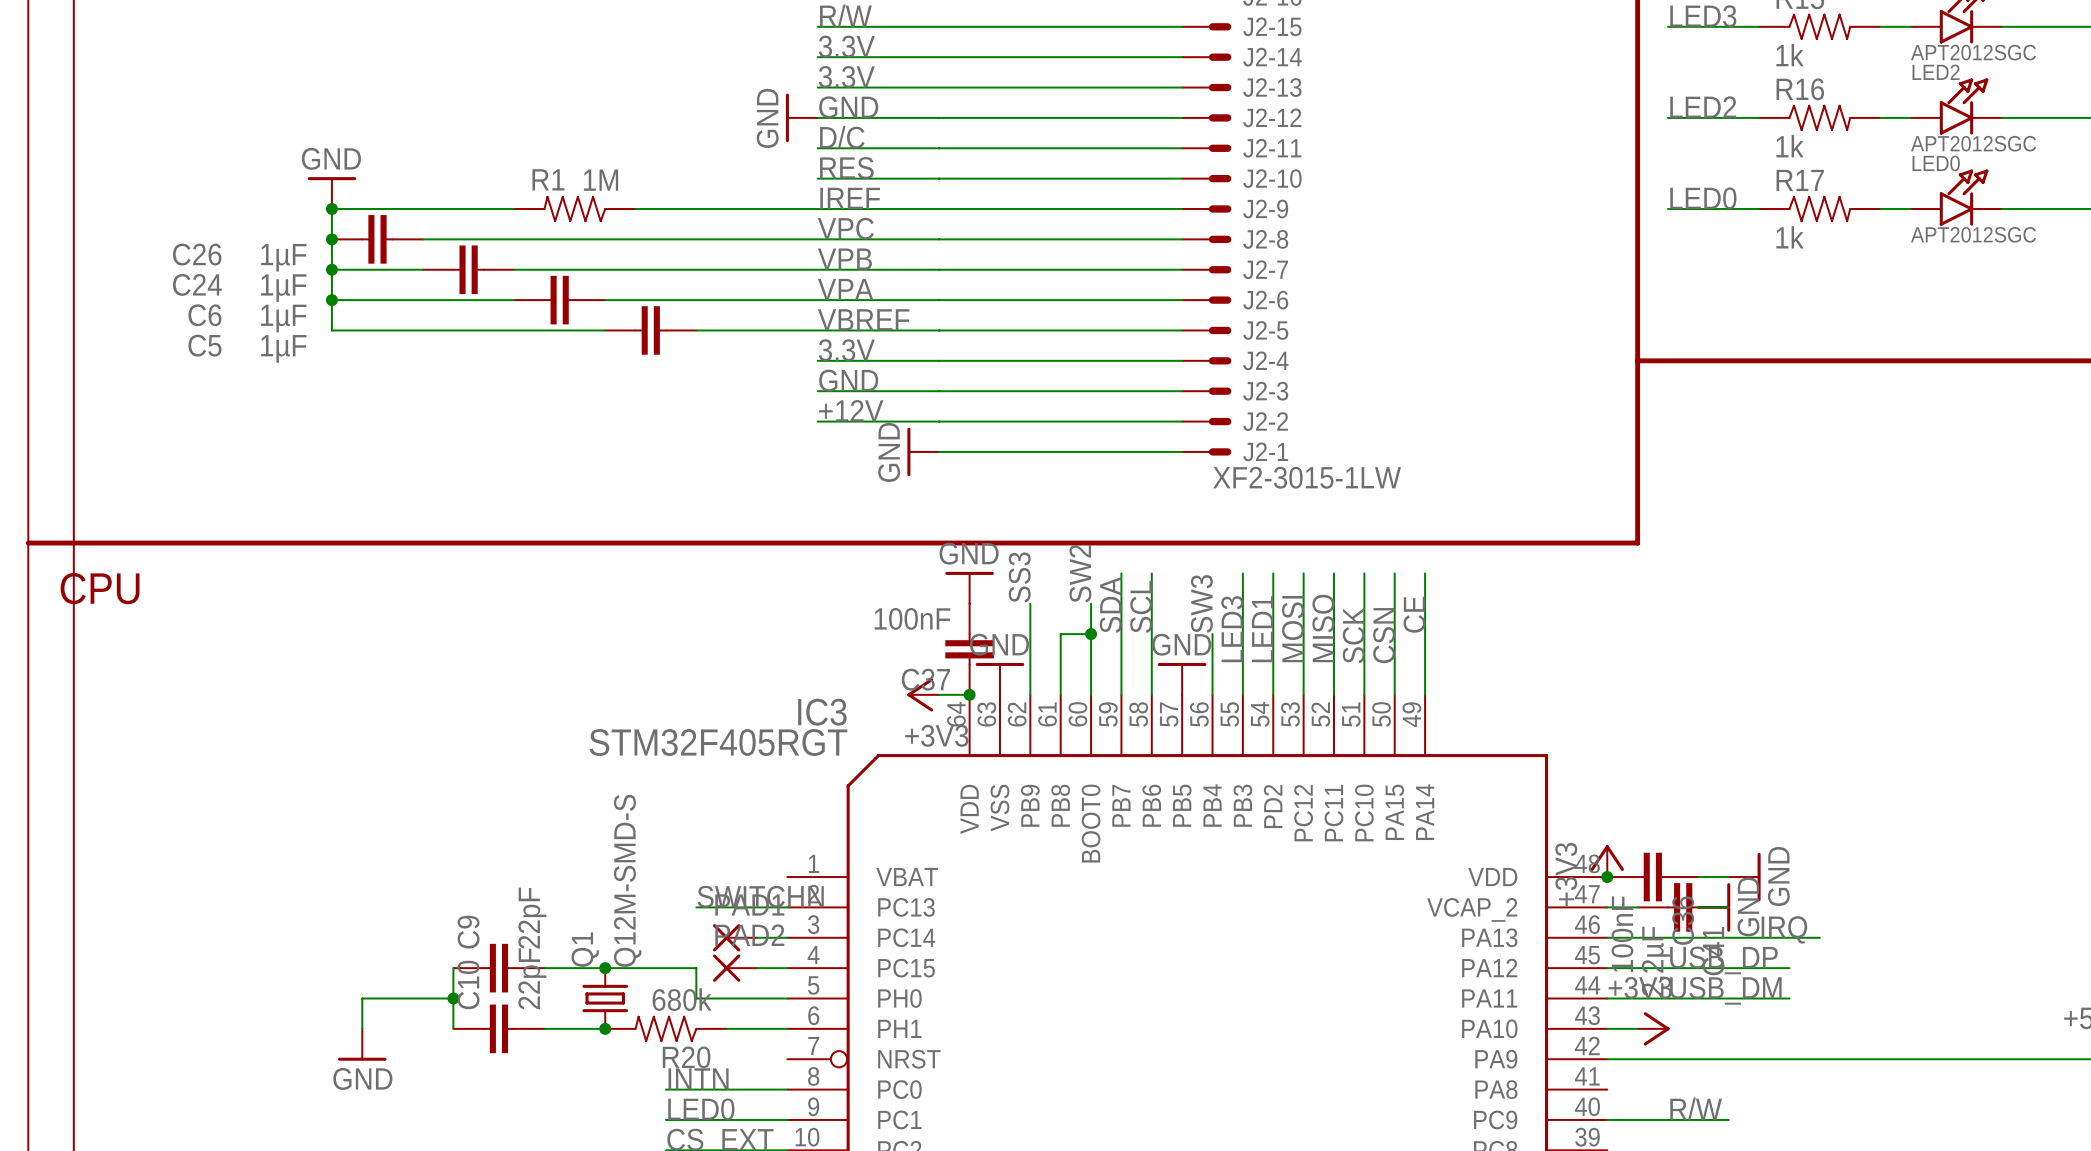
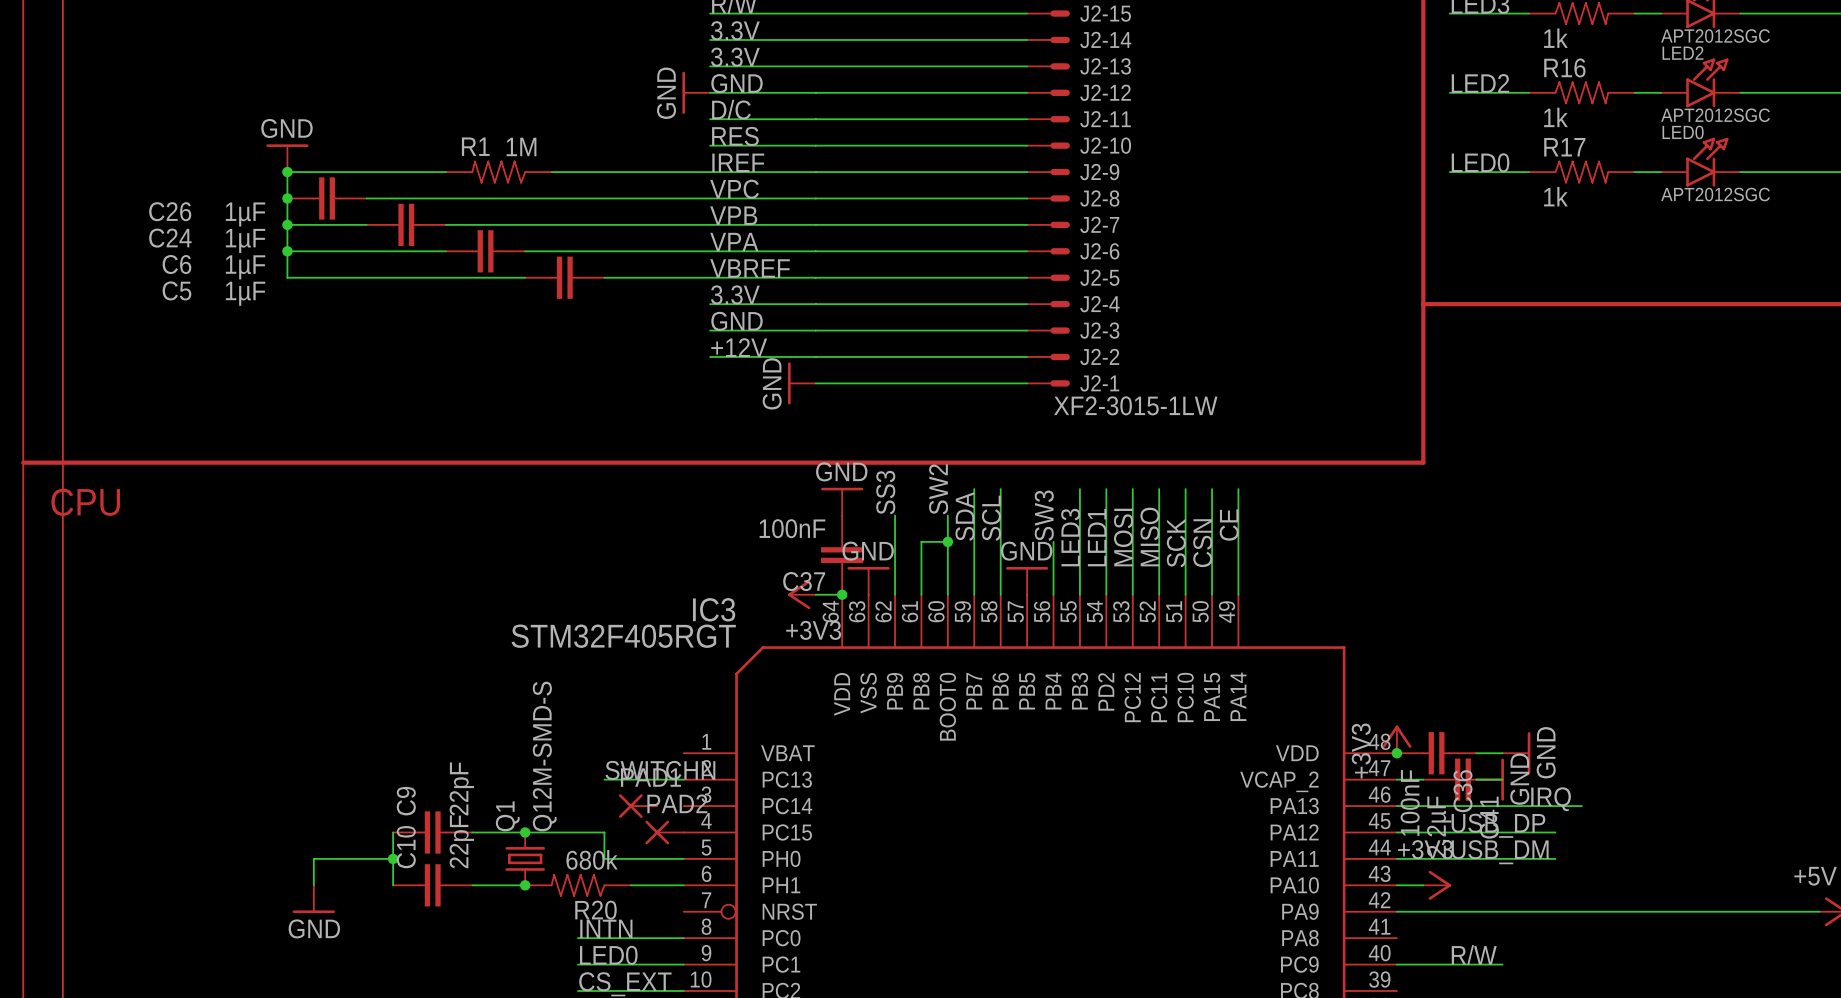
wire: (757, 937) (787, 937) -> none
PAD2 position: (735, 968) -> (664, 832)

